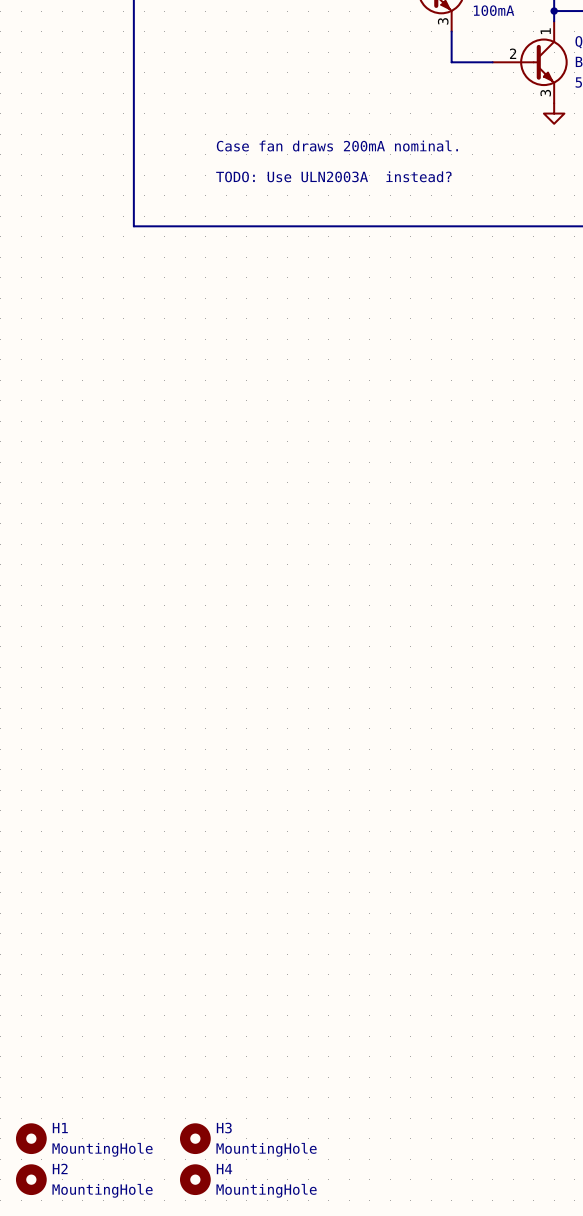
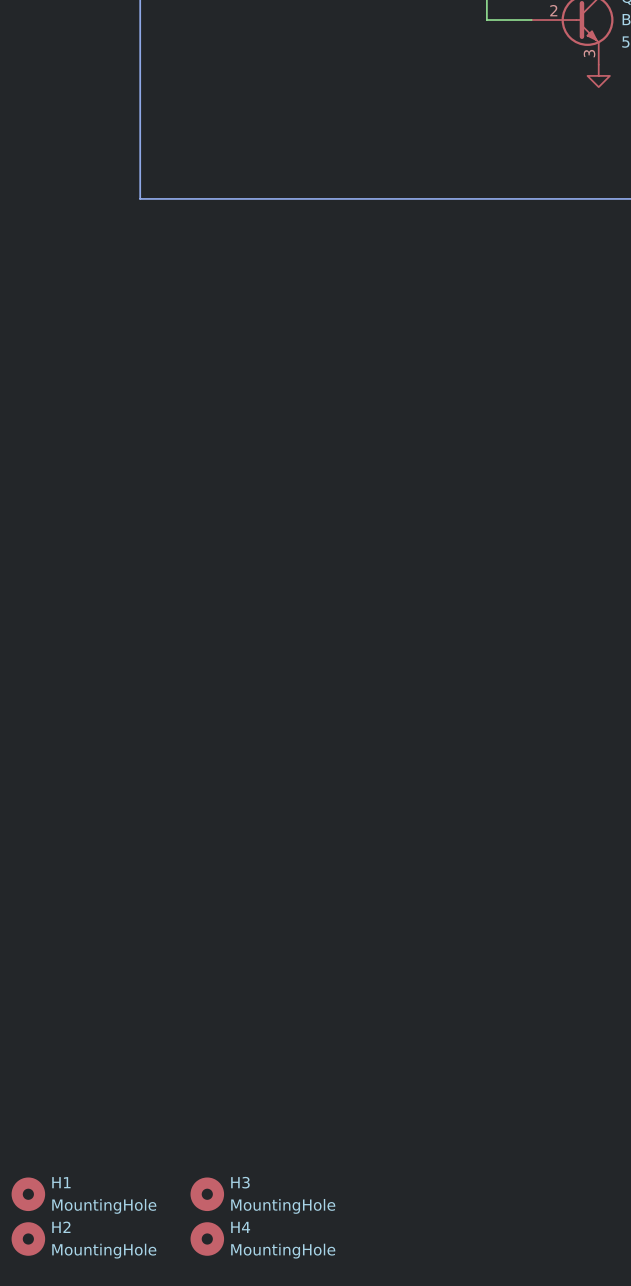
text: Case fan draws 200mA nominal. (337, 146) -> none
text: TODO: Use ULN2003A instead? (333, 176) -> none

